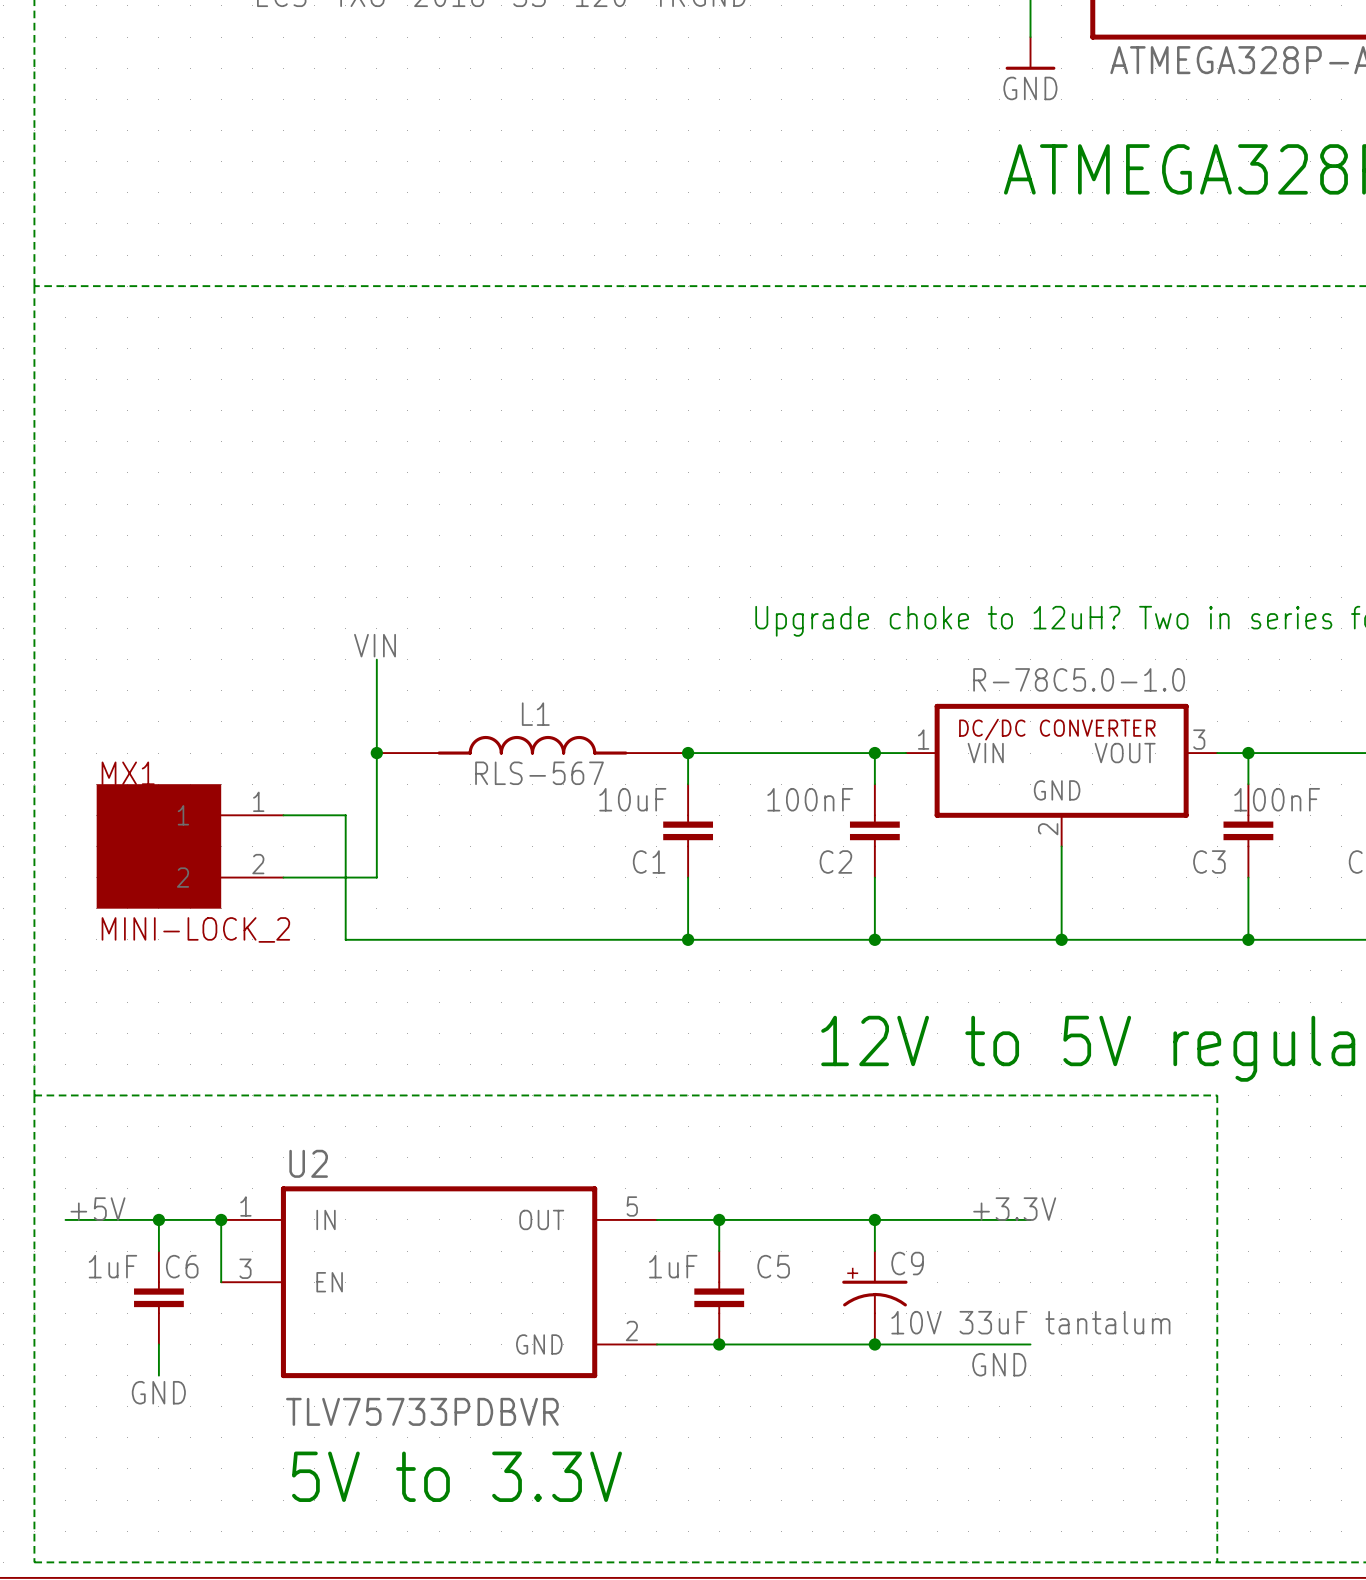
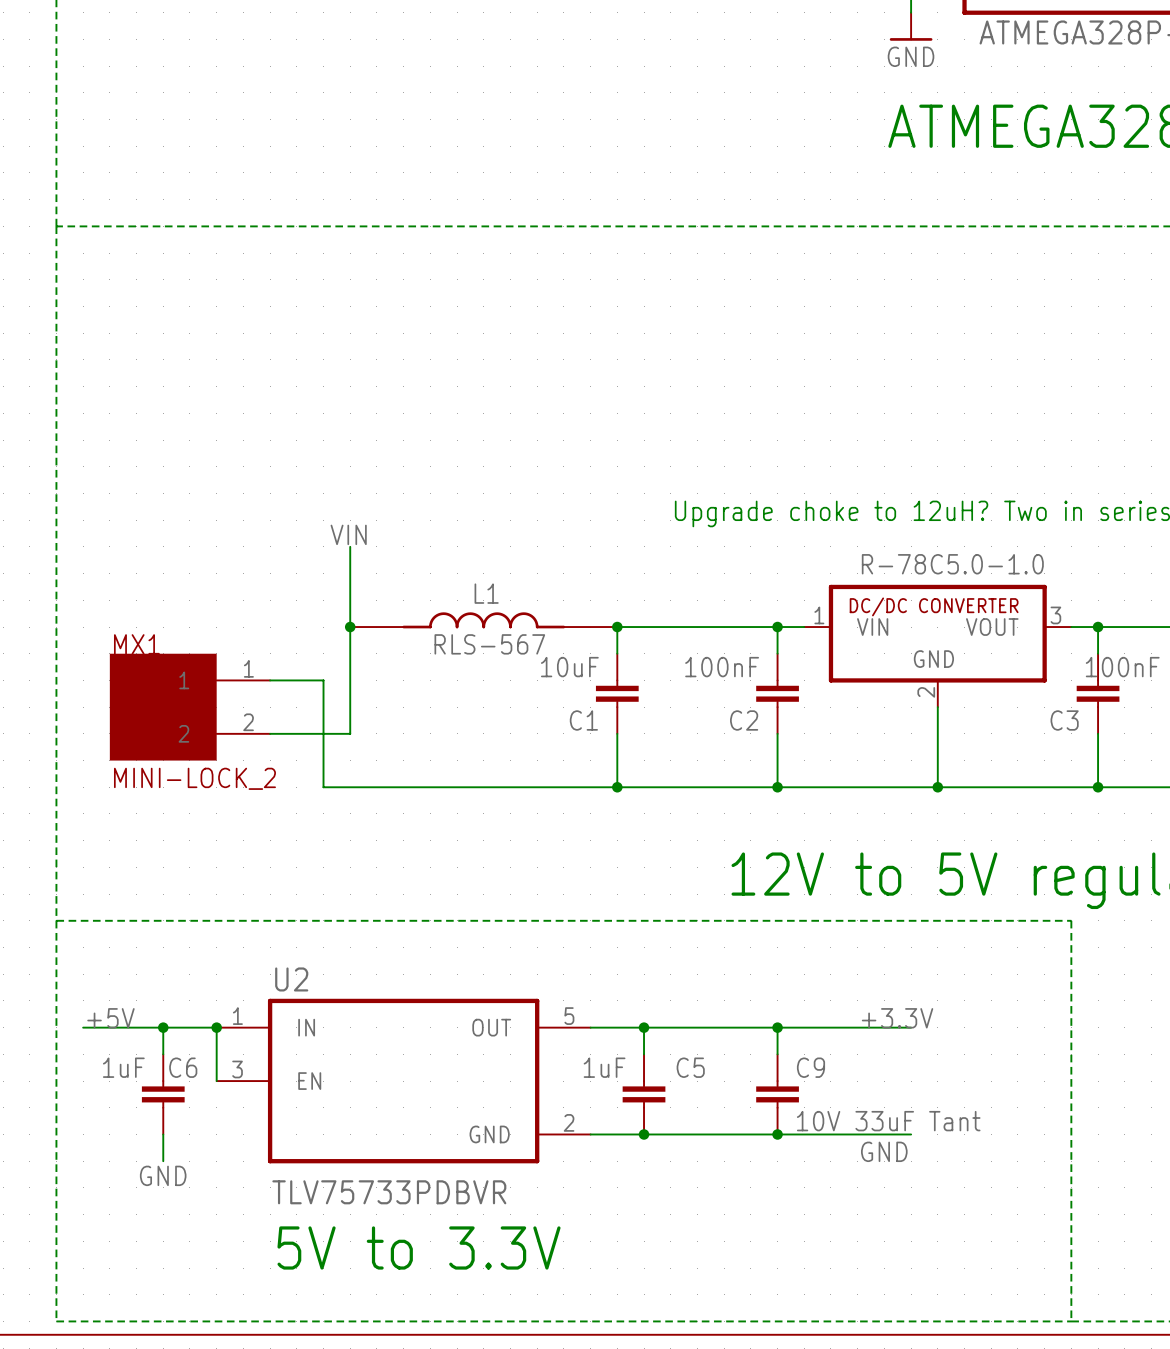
C9 symbol: [842, 1251, 908, 1345] -> [756, 1054, 799, 1135]
C9 value: 10V 33uF tantalum (1030, 1322) -> 10V 33uF Tant (888, 1121)

